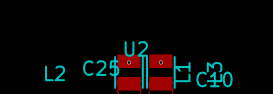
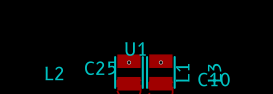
U2 name: U2 (136, 48) -> U1 (135, 49)

